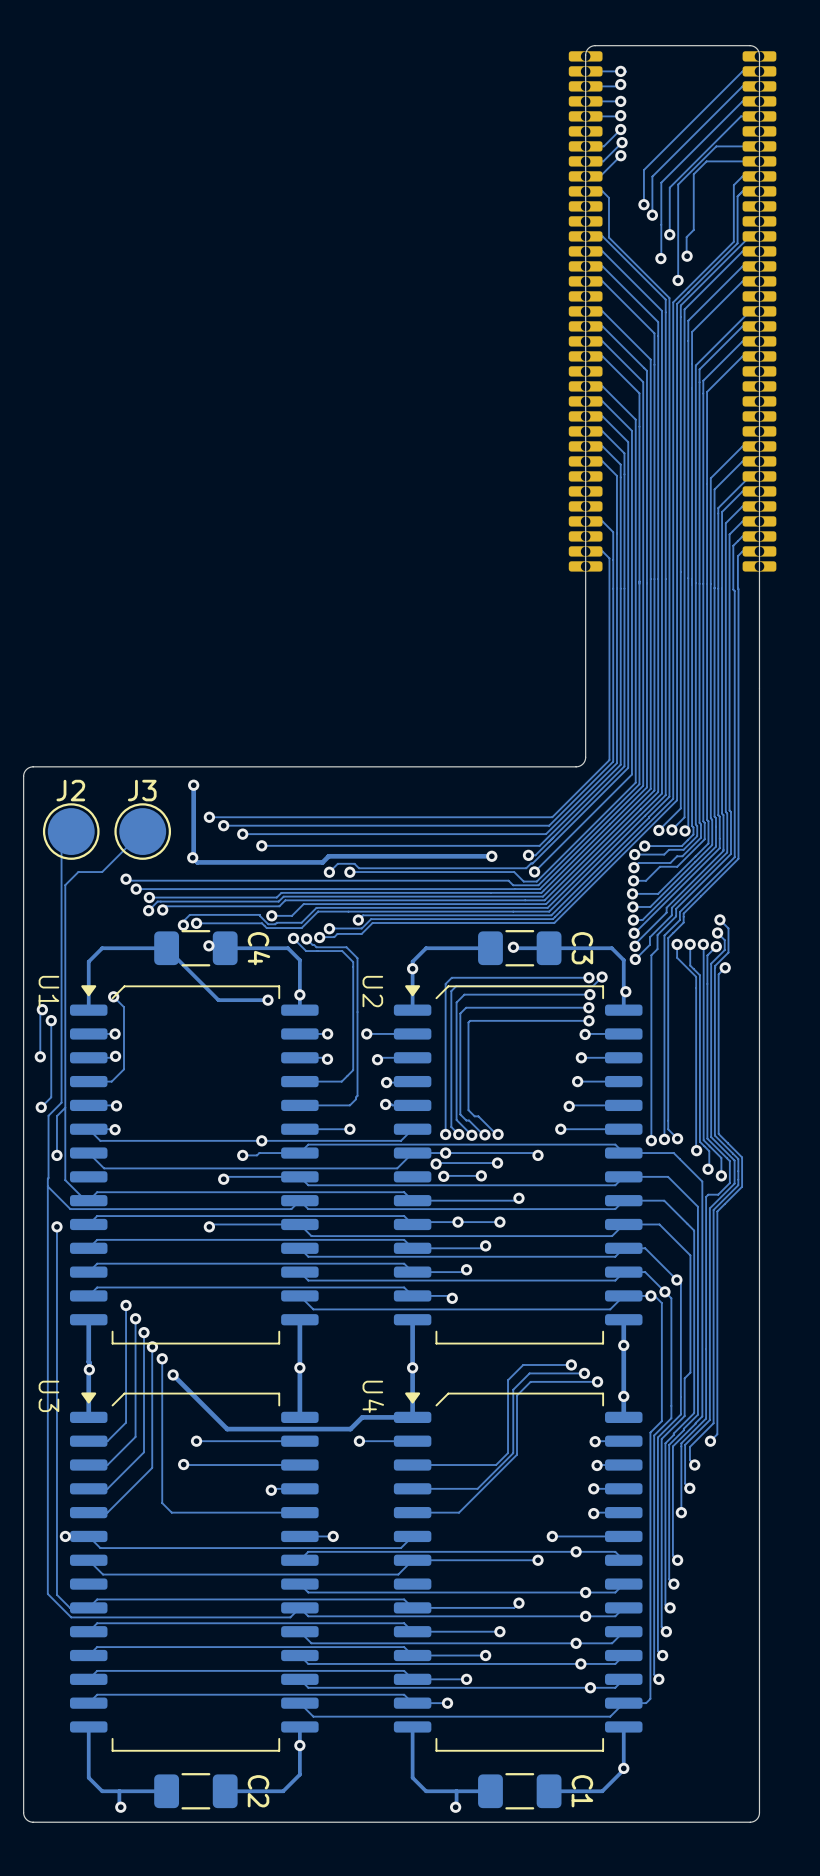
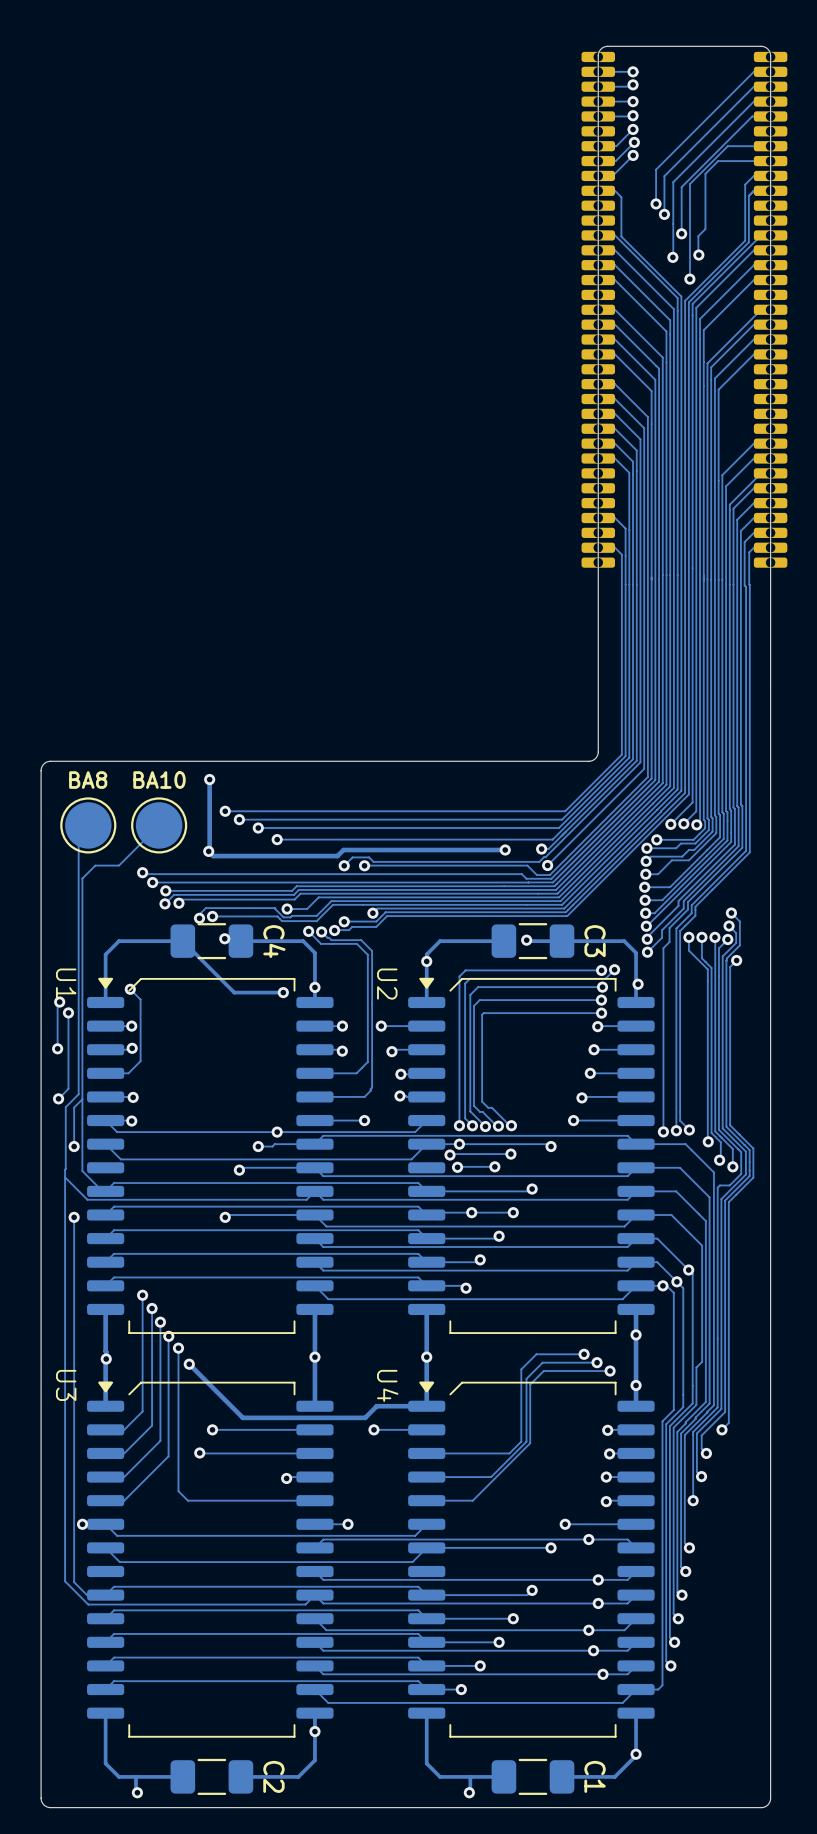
J2 value: none -> BA8 (88, 780)
J3 value: none -> BA10 (159, 780)
J2 name: J2 (70, 790) -> none
J3 name: J3 (142, 790) -> none

